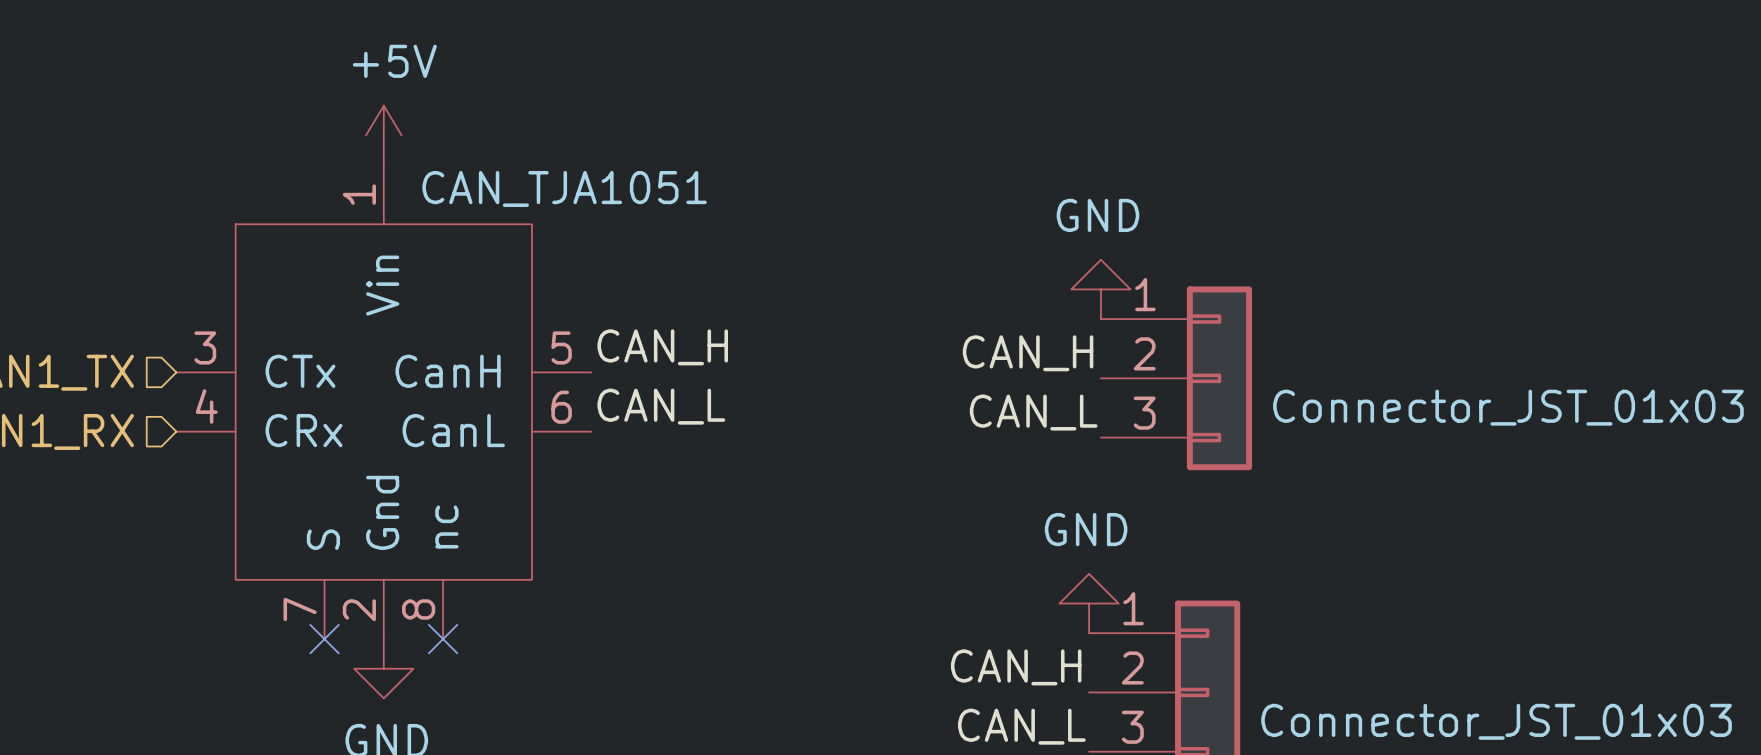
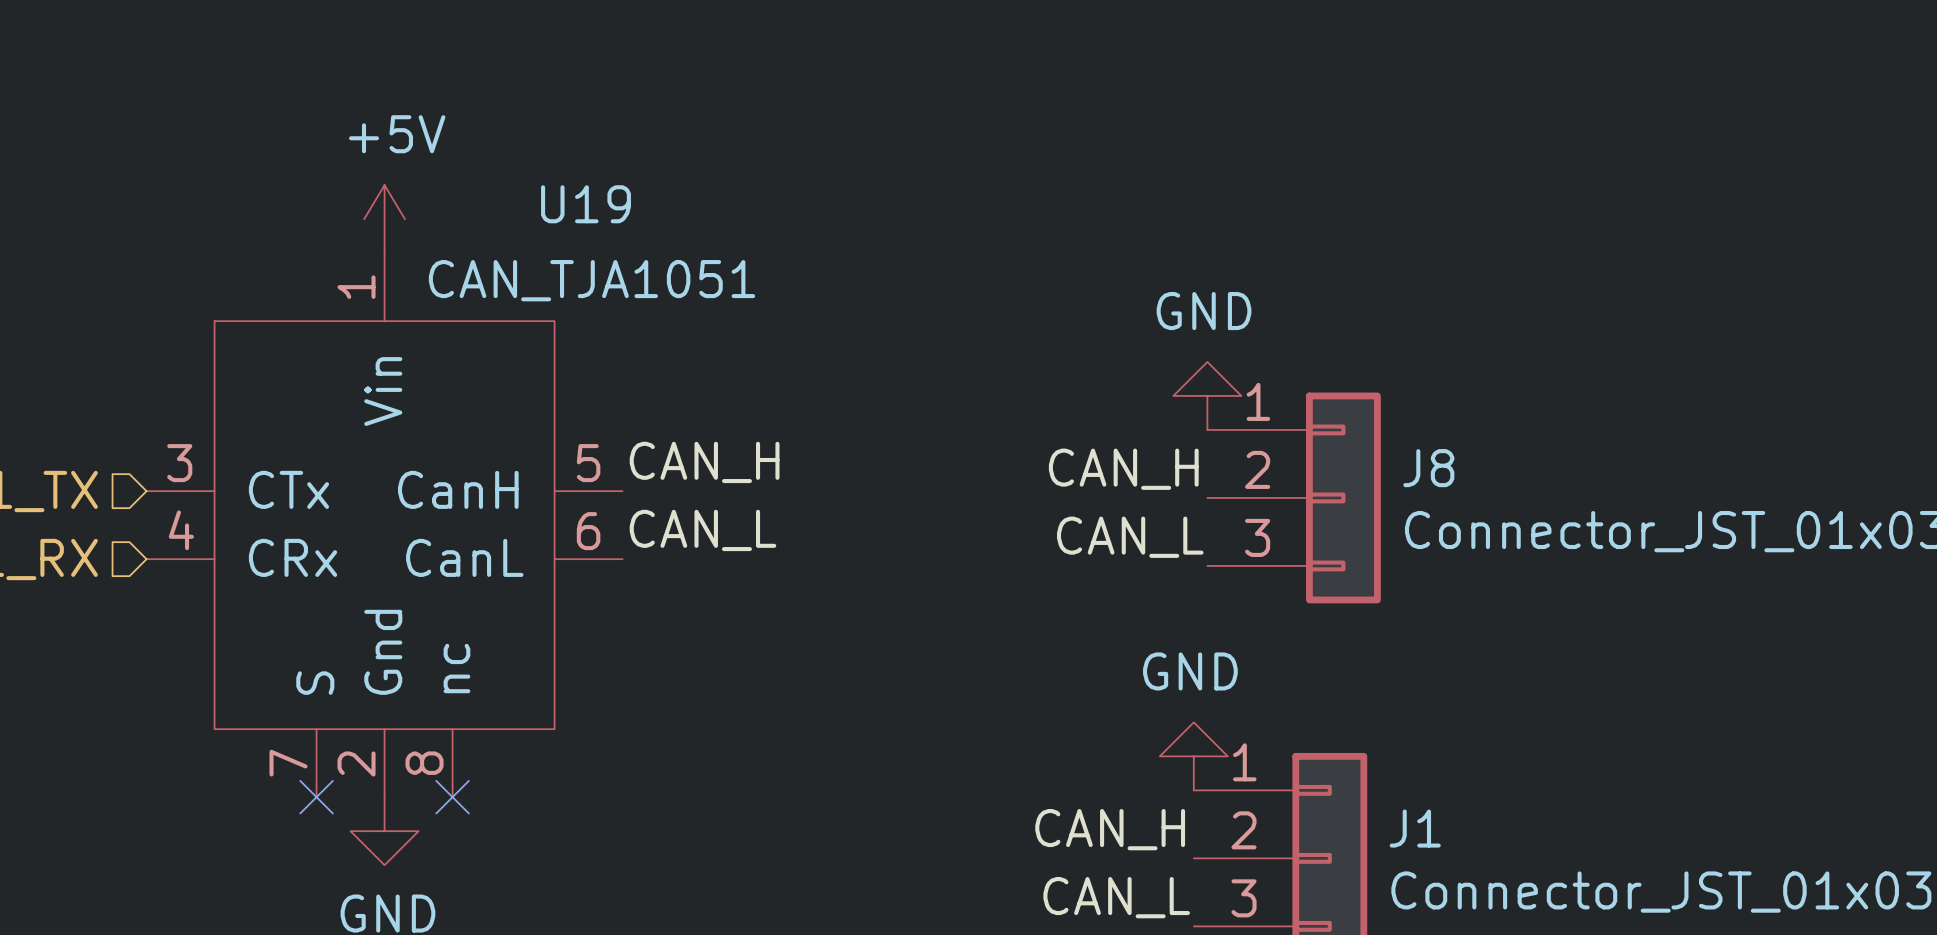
U19 name: none -> U19 (585, 204)
J8 name: none -> J8 (1428, 468)
J1 name: none -> J1 (1415, 828)

